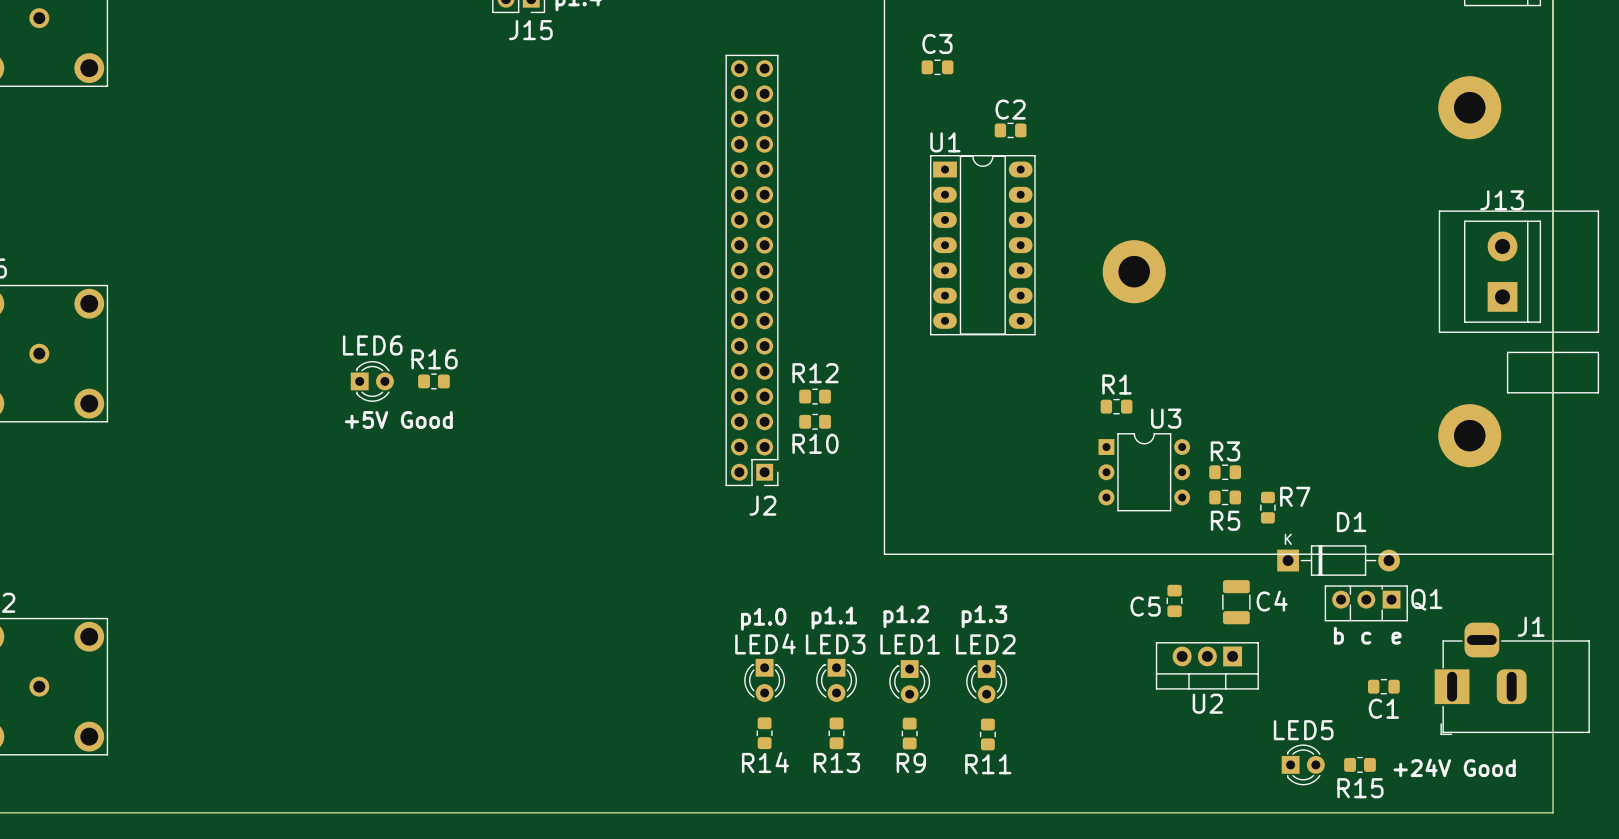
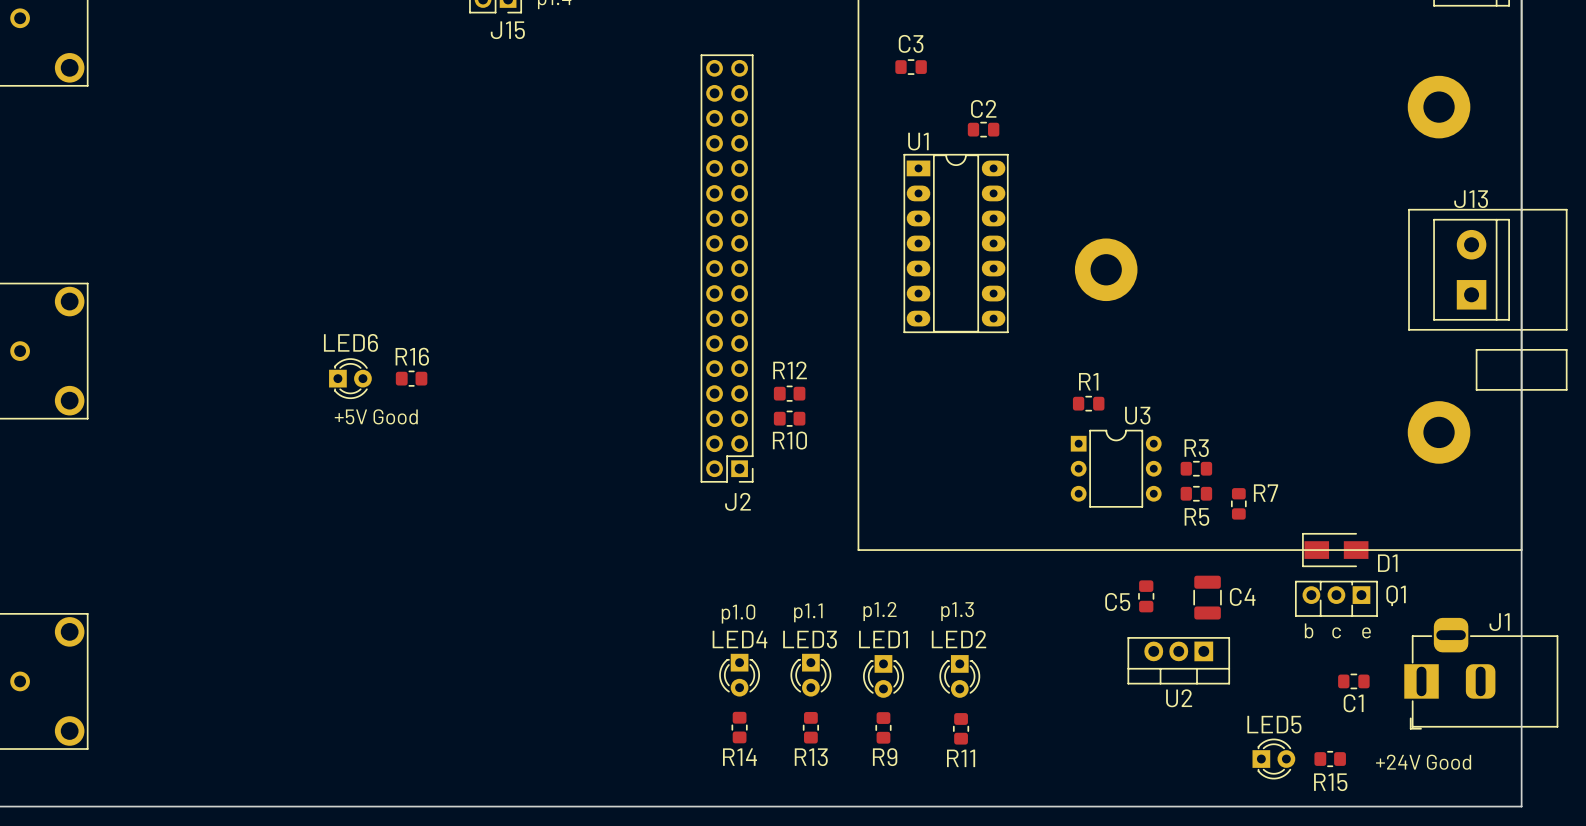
D1 name position: D1 (1351, 522) -> D1 (1387, 563)
D1 footprint: [1277, 545, 1400, 576] -> [1302, 533, 1369, 567]

